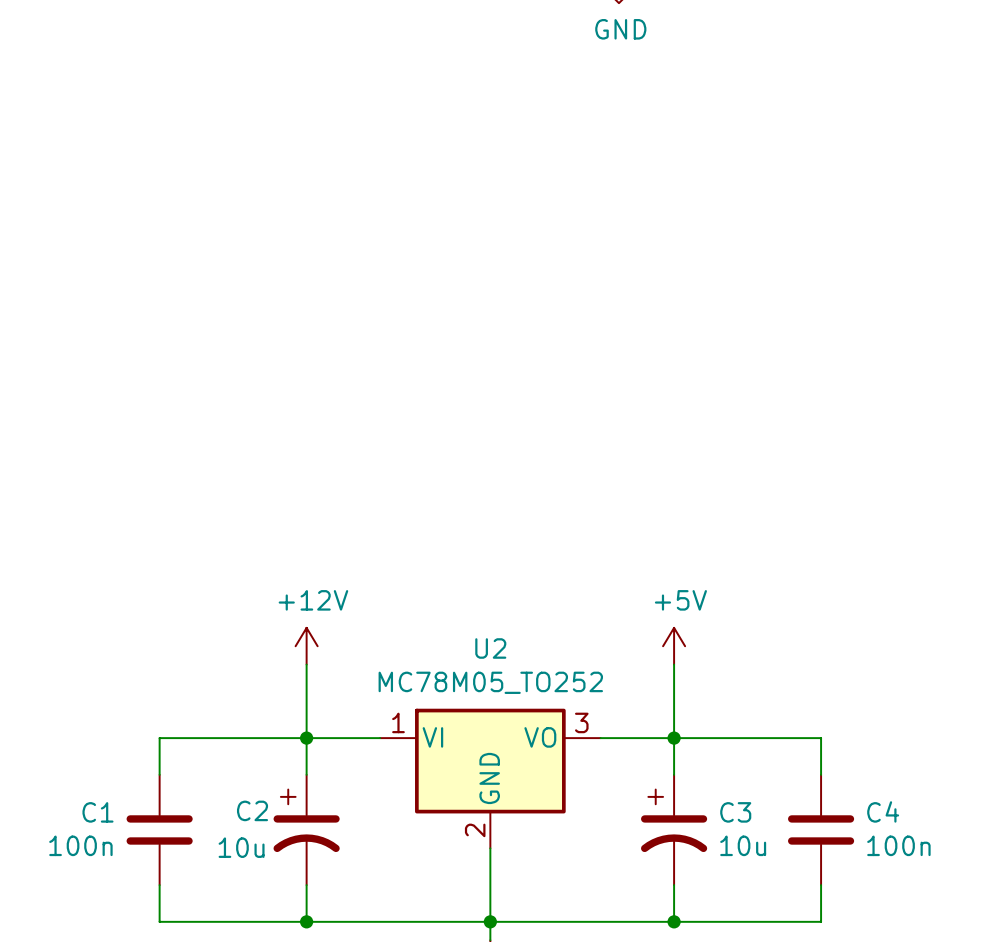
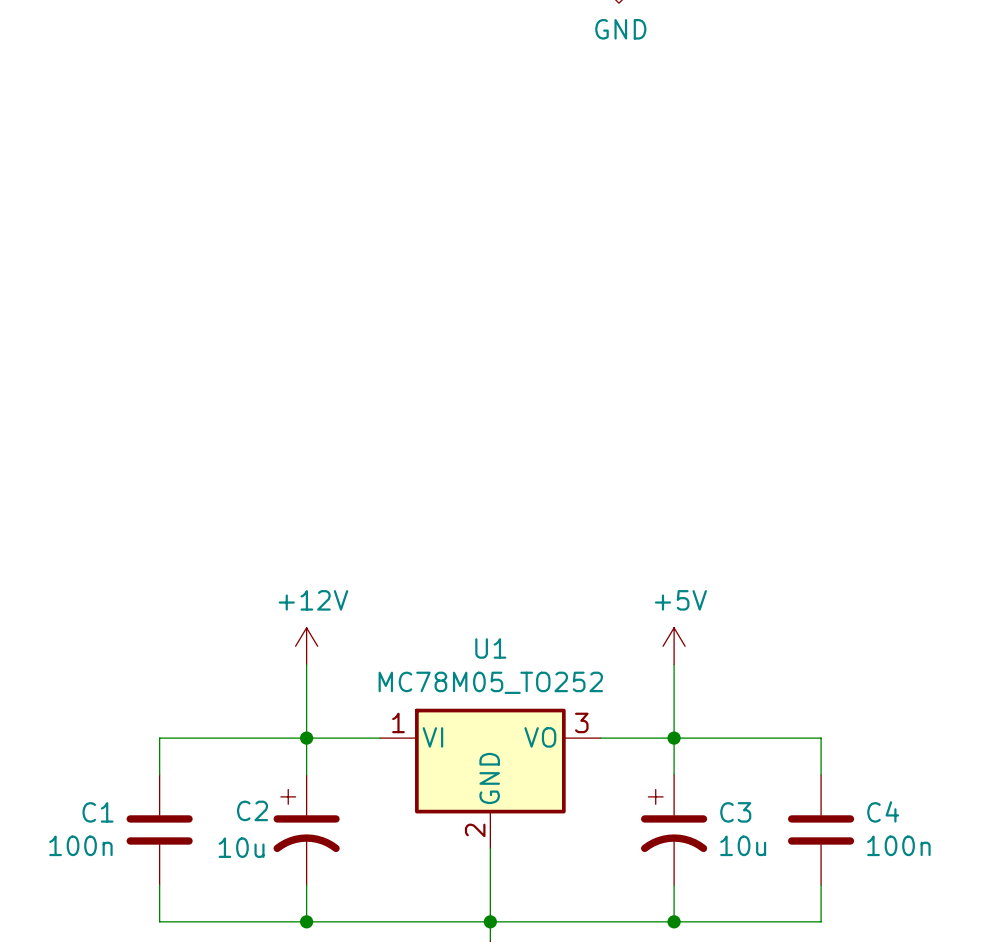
U2 name: U2 (490, 648) -> U1 (490, 648)

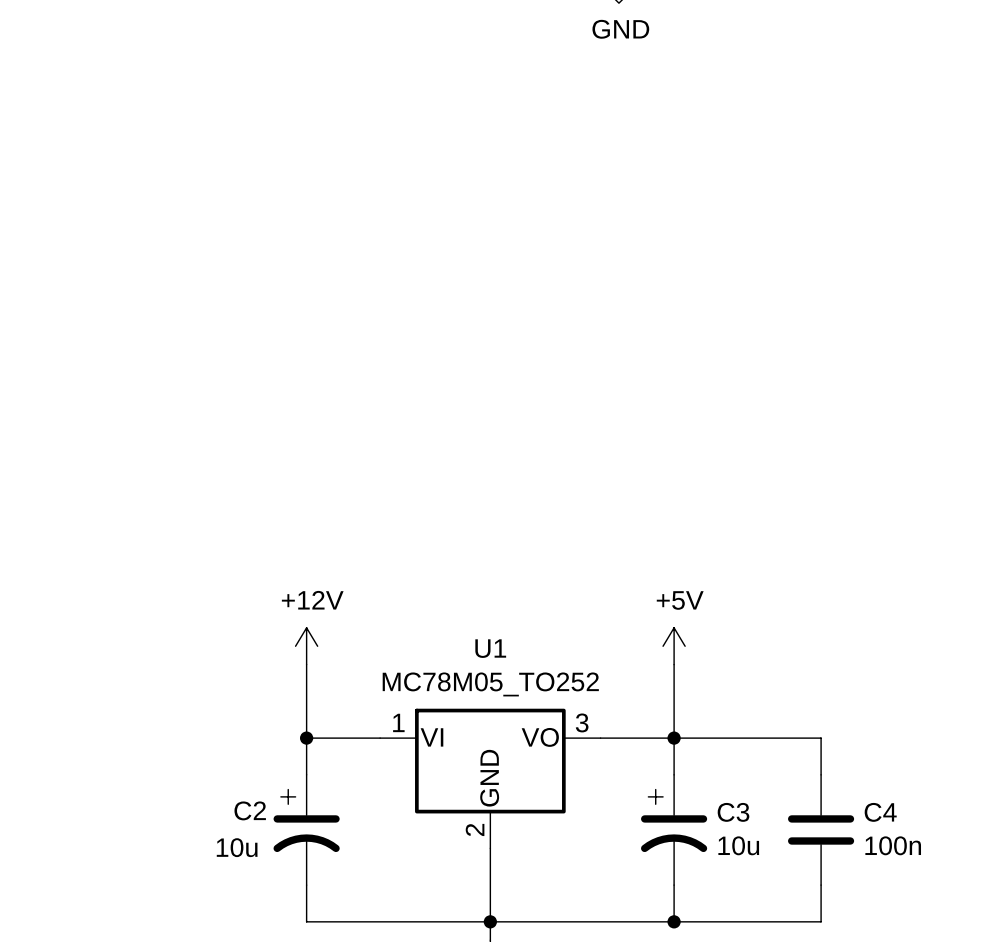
wire: (306, 738) (159, 738) (159, 774) -> none
C1: 100n (159, 829) -> none
wire: (159, 885) (159, 921) (306, 921) -> none
junction: (306, 921) -> none

